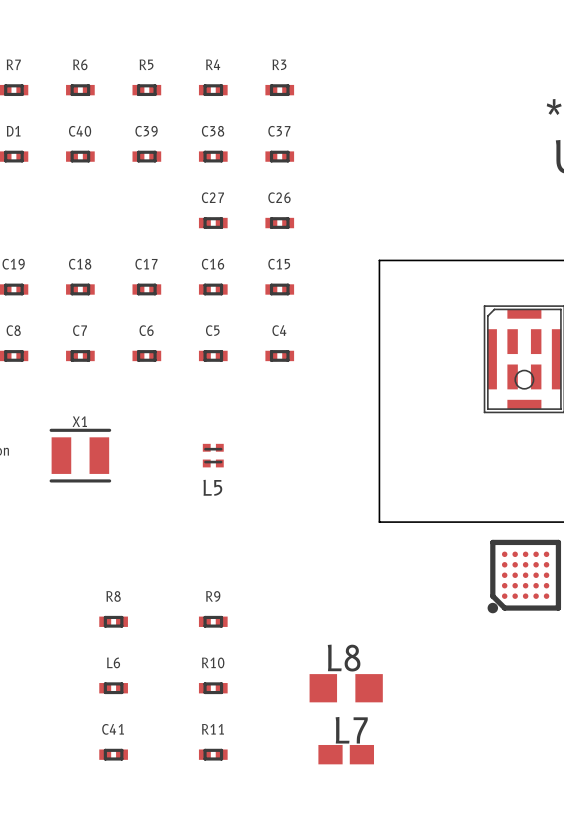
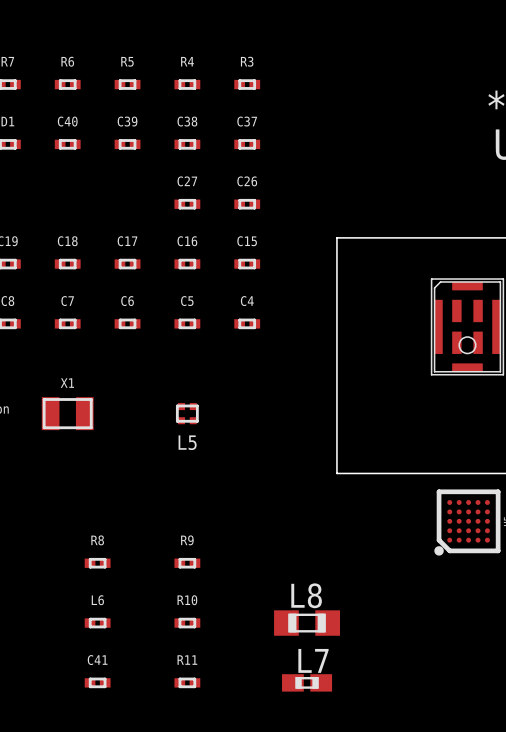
X1 footprint: [49, 428, 112, 483] -> [41, 397, 94, 431]
L5 footprint: [202, 443, 224, 468] -> [175, 403, 199, 425]
L8 footprint: [309, 674, 383, 703] -> [274, 610, 341, 636]
L7 footprint: [318, 744, 375, 765] -> [282, 674, 333, 692]

